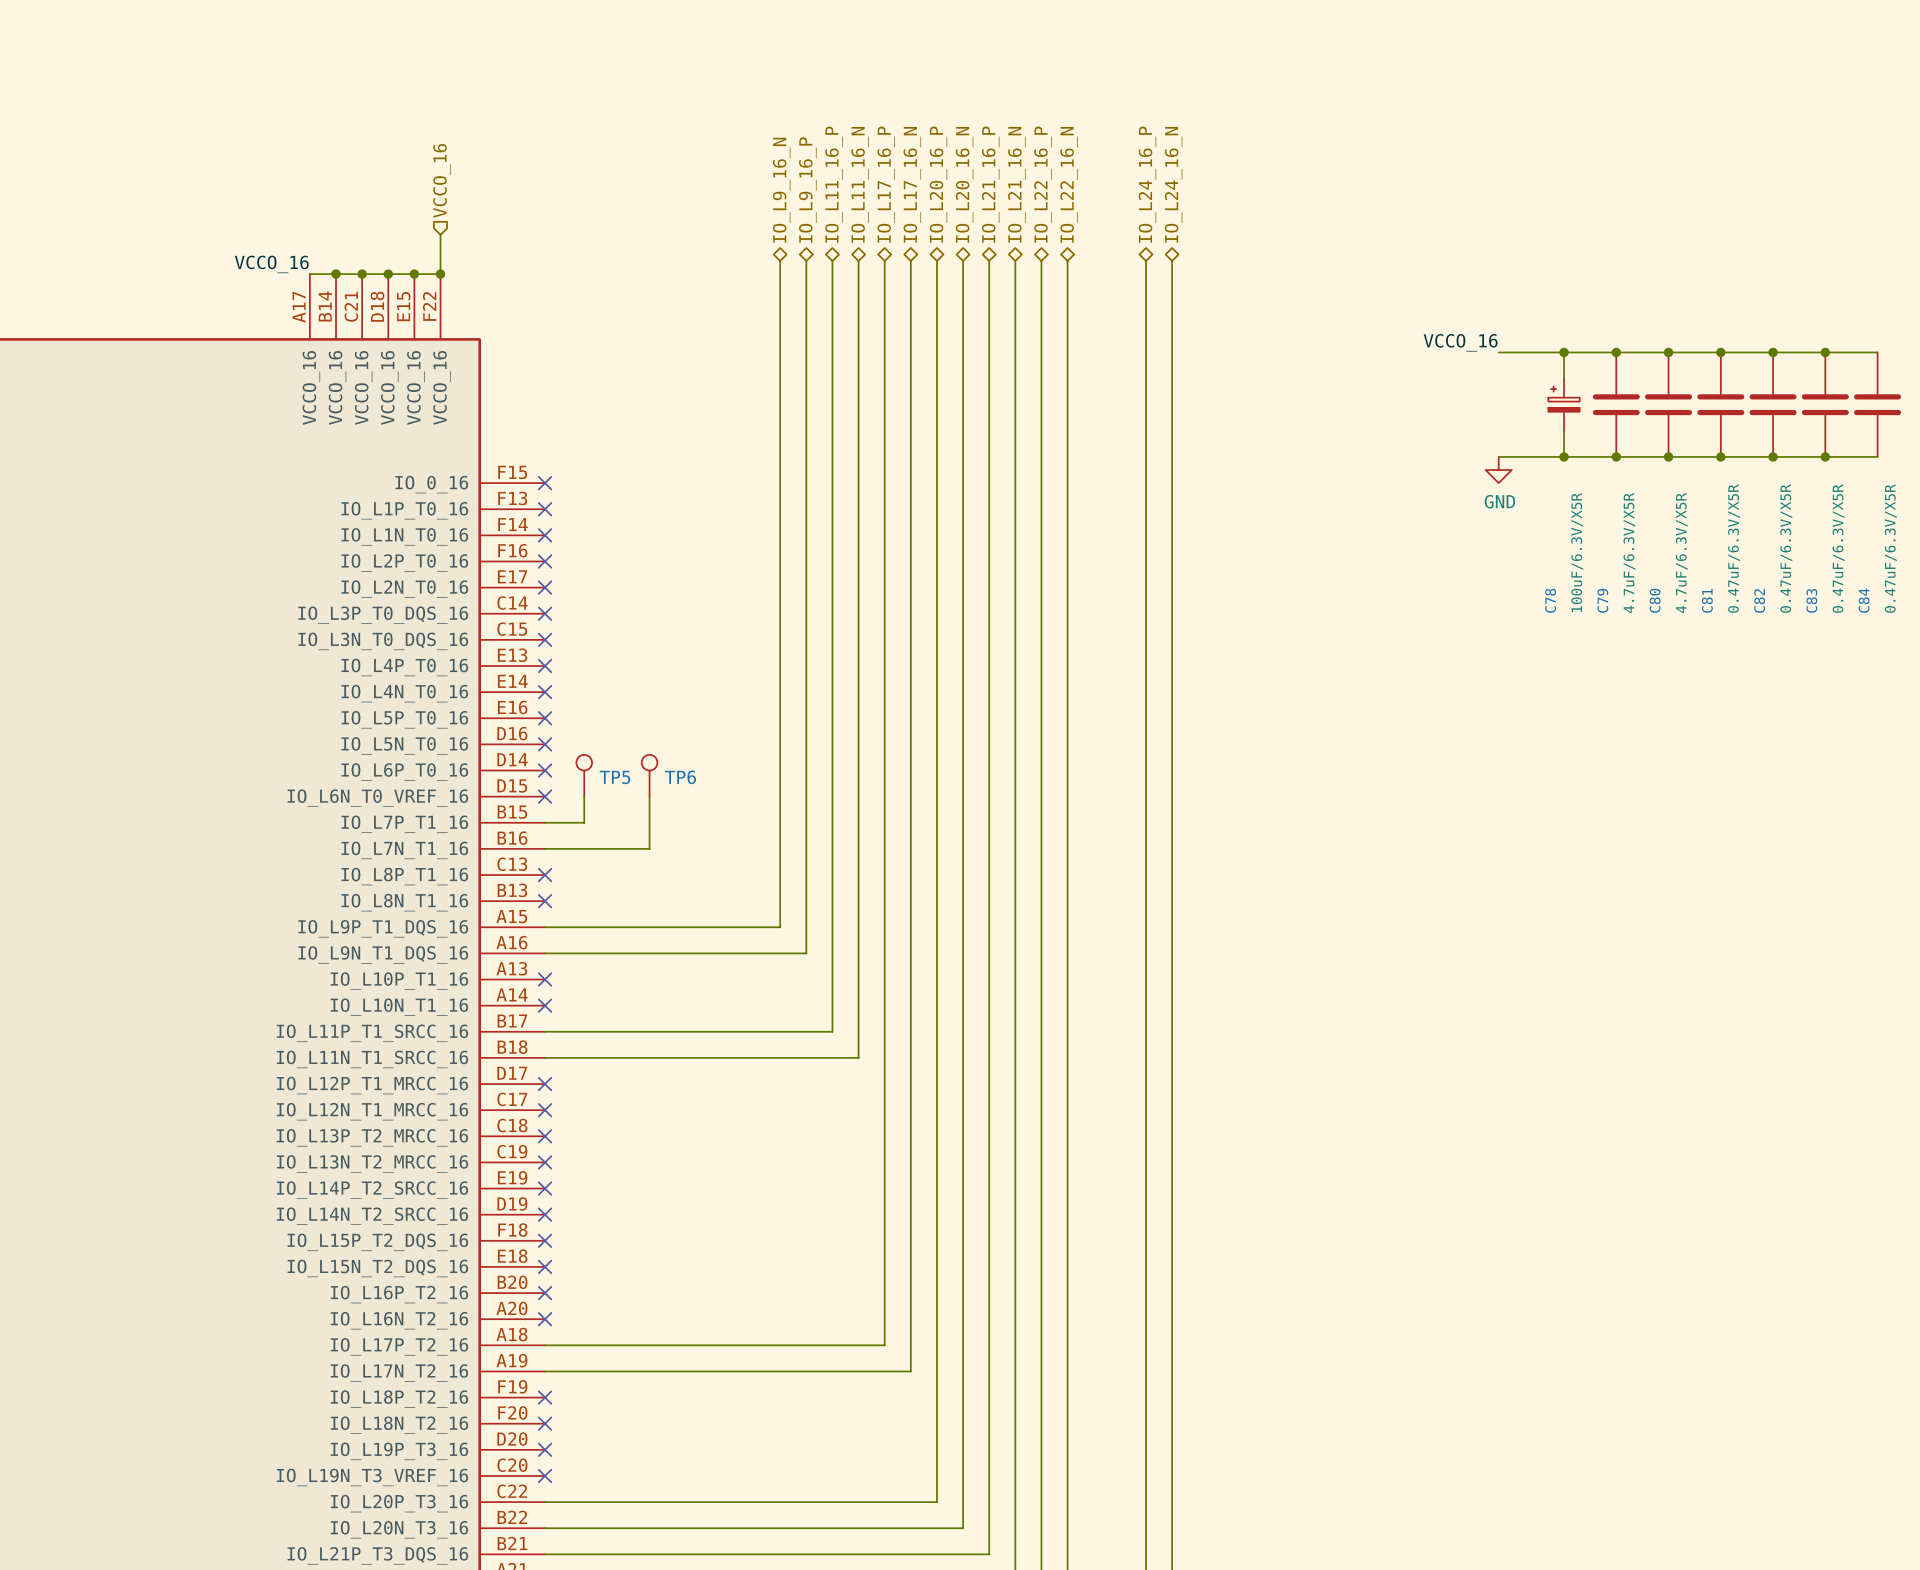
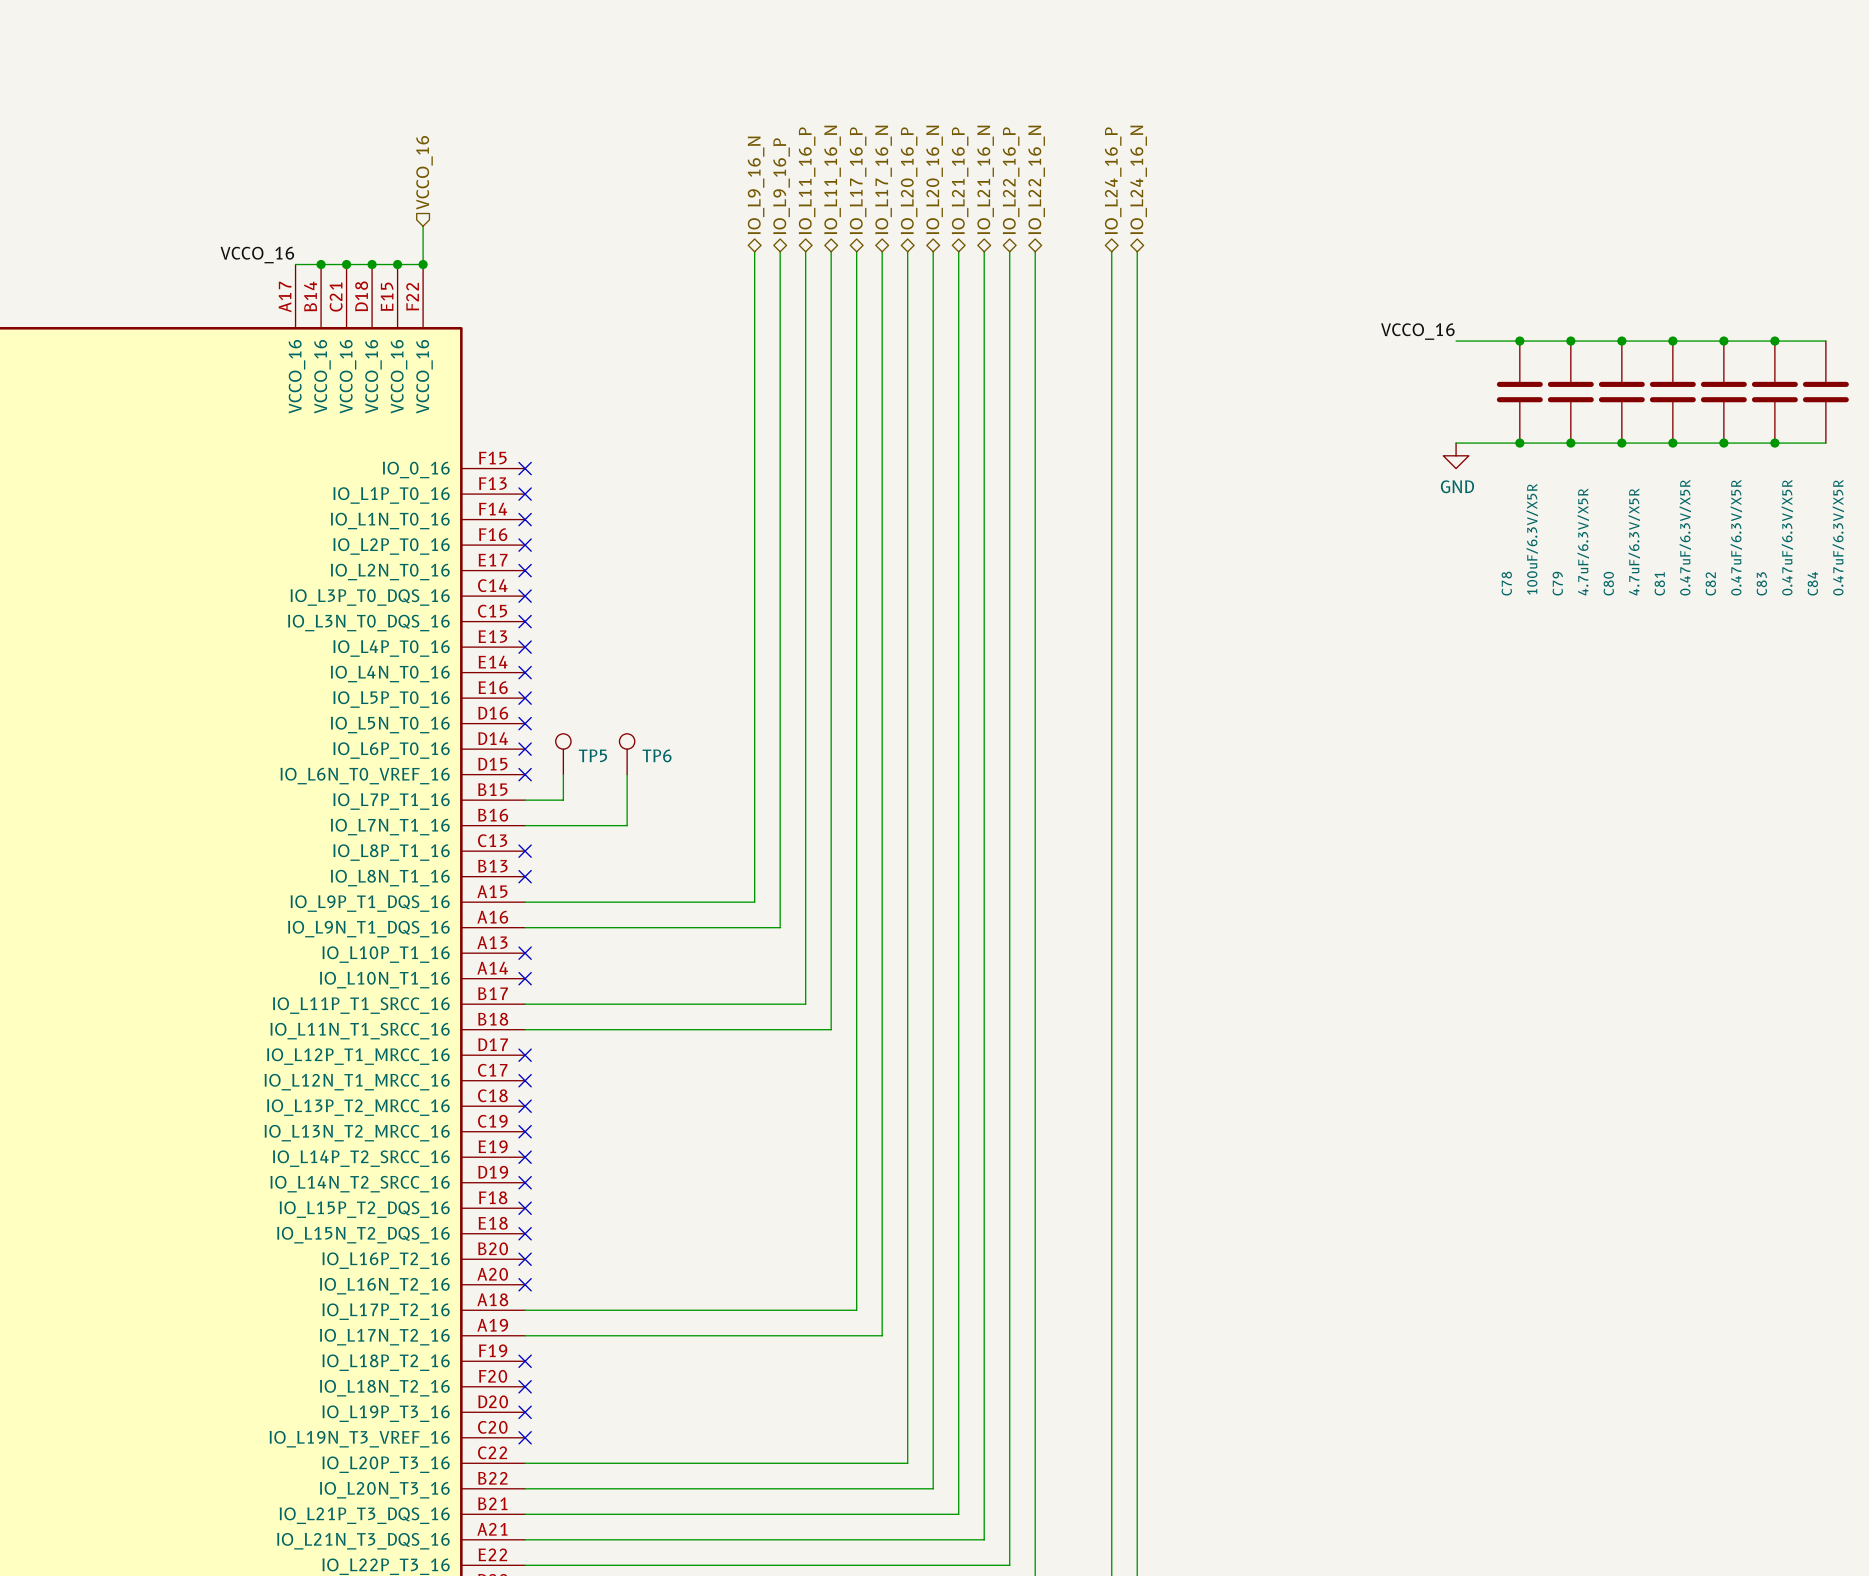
C78 symbol: [1548, 378, 1580, 431] -> [1496, 341, 1543, 444]

